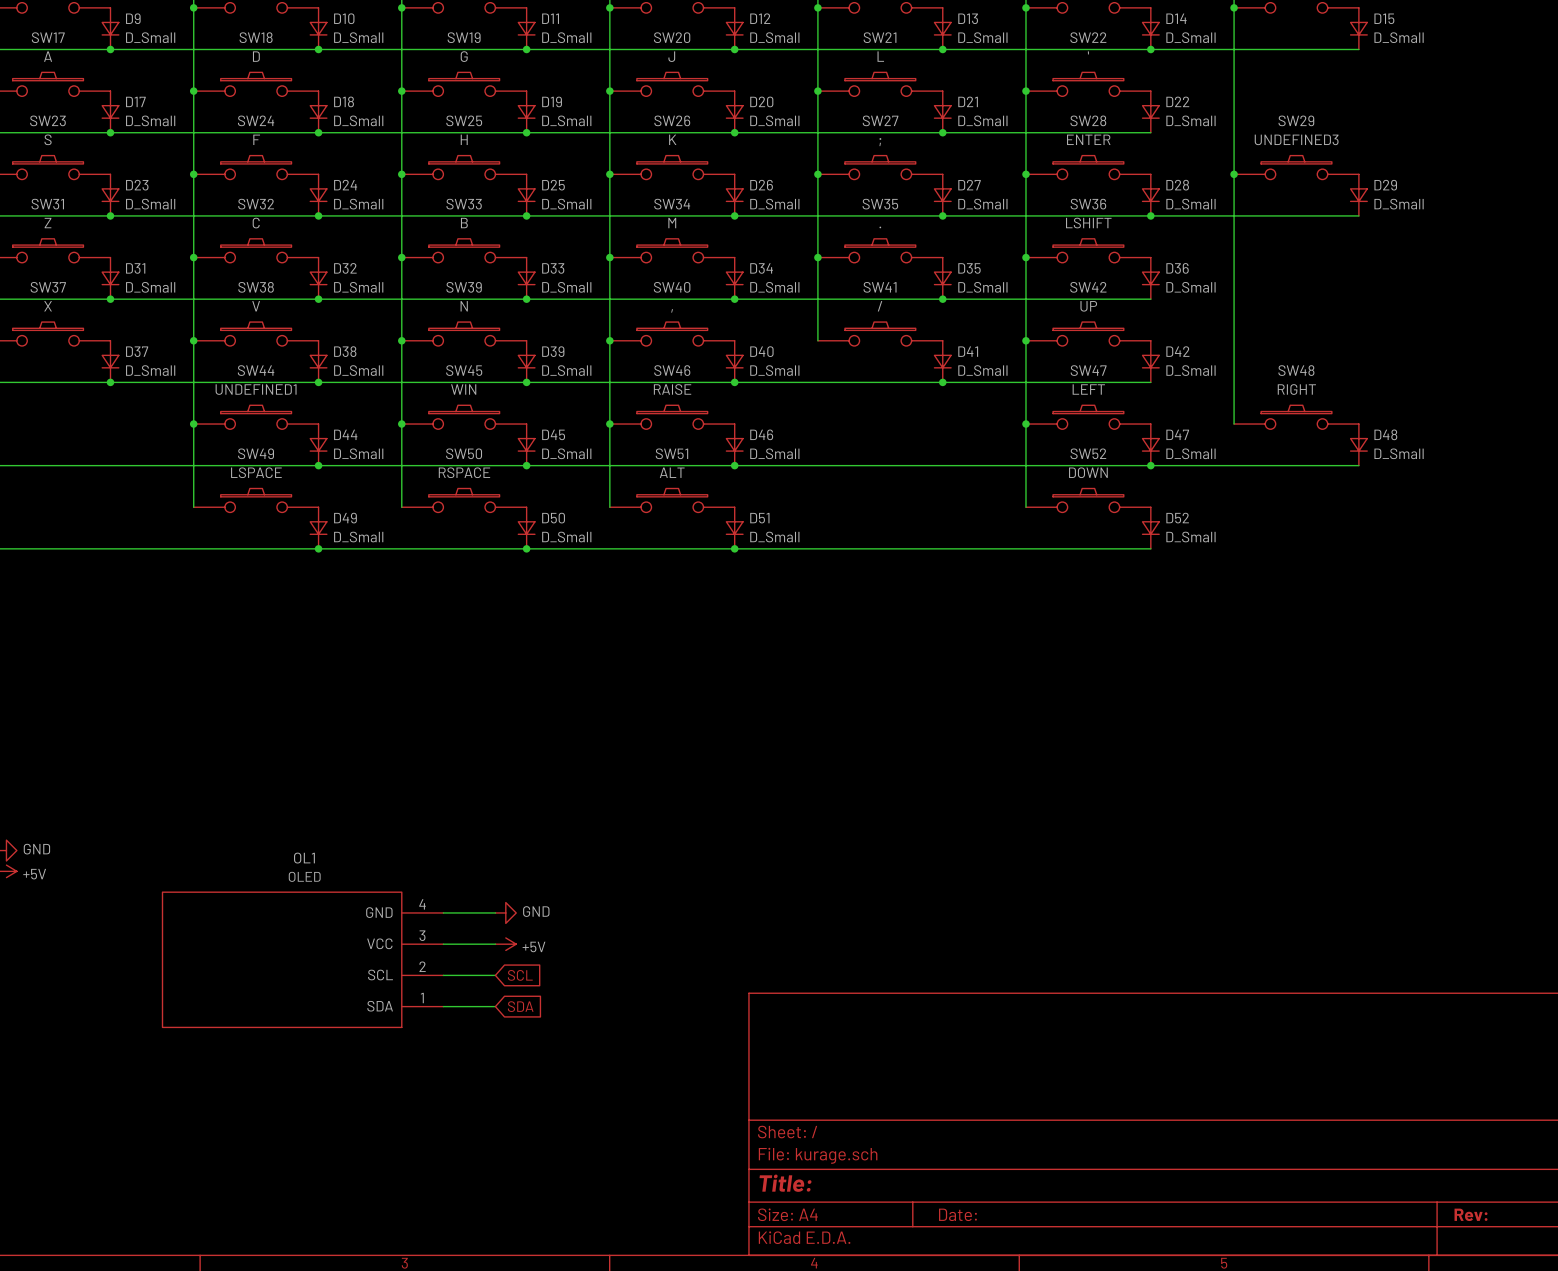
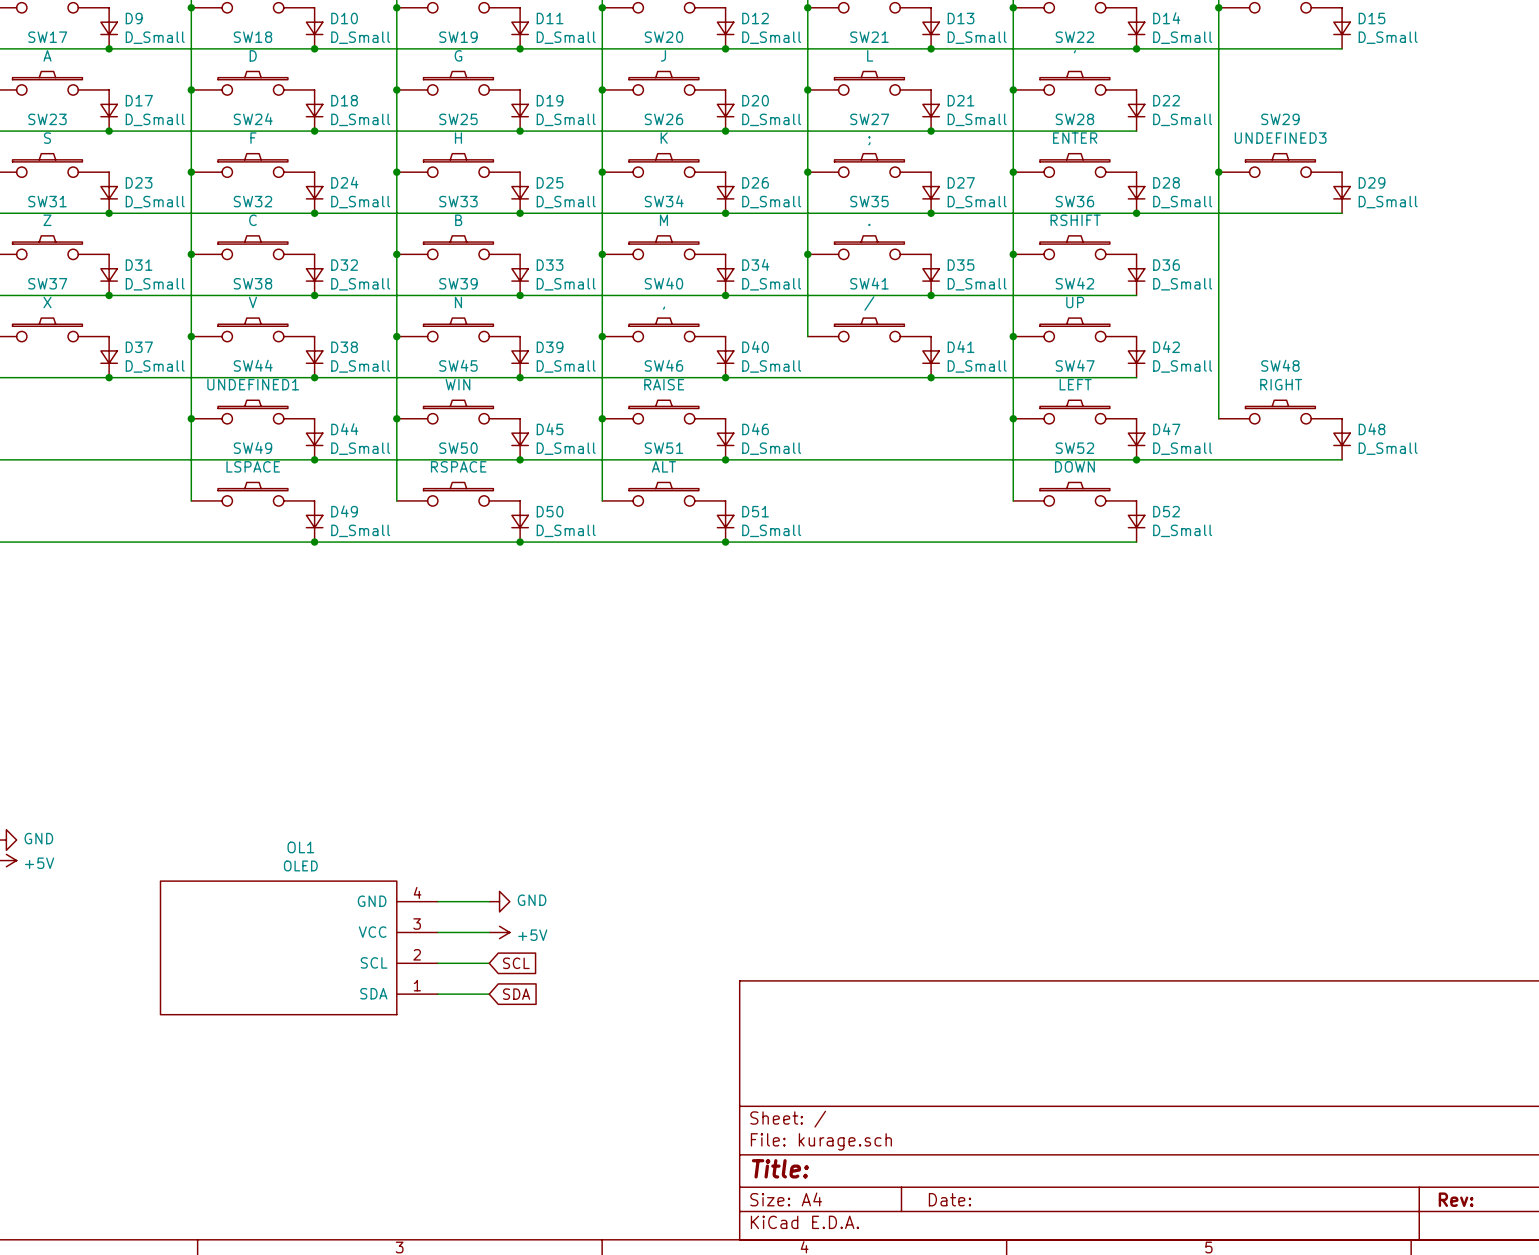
SW36 value: LSHIFT (1088, 223) -> RSHIFT (1075, 220)

